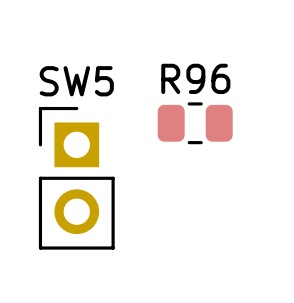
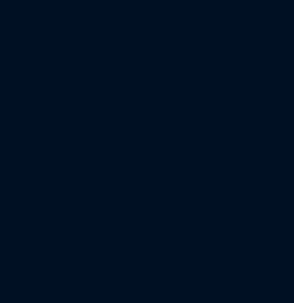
R96: (195, 123) -> none
SW5: (76, 178) -> none

